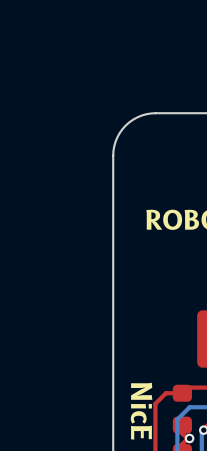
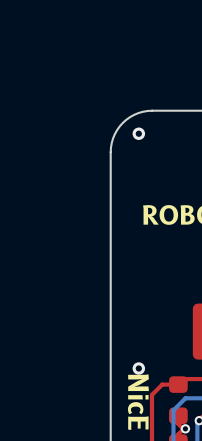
via: none -> (138, 133)
via: none -> (138, 368)

